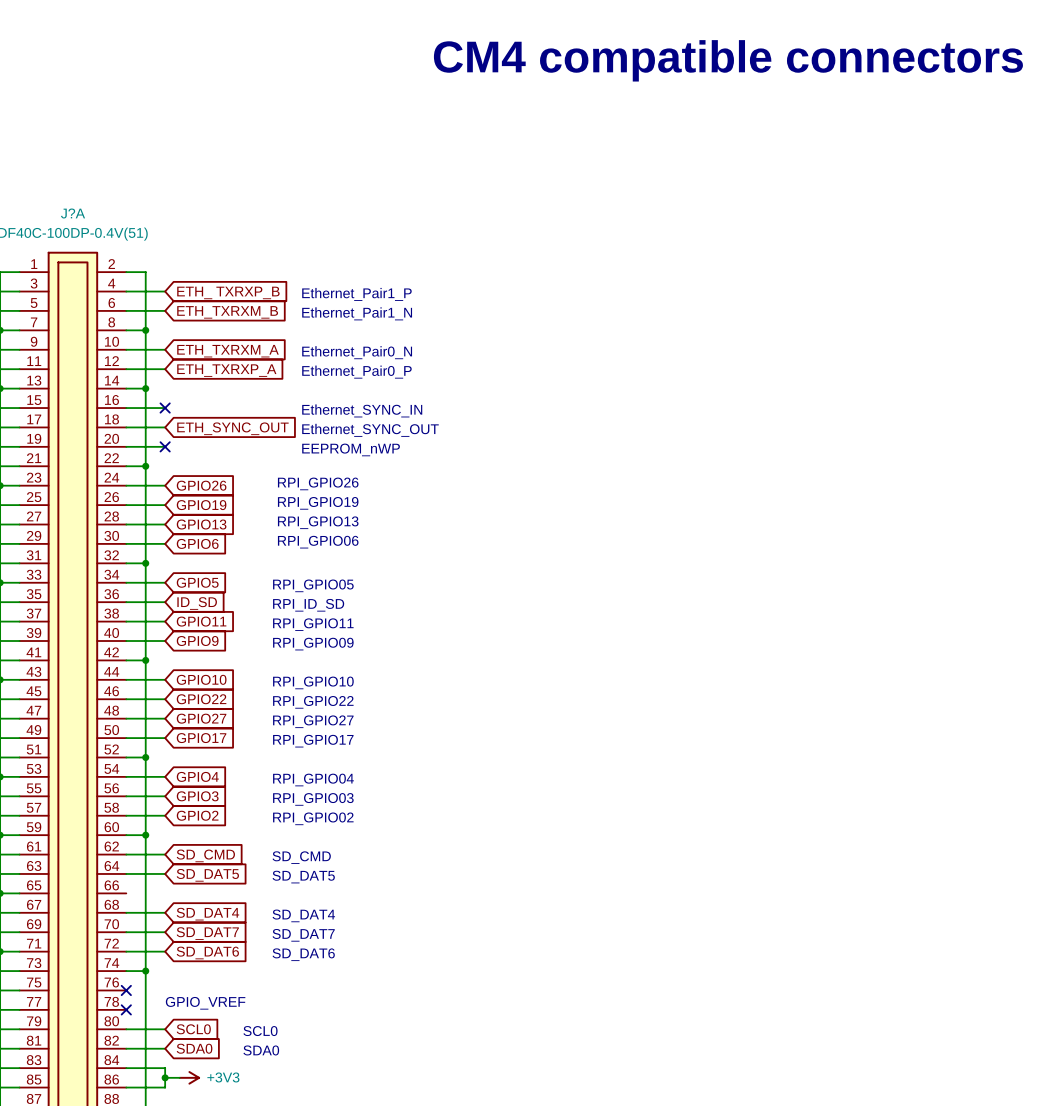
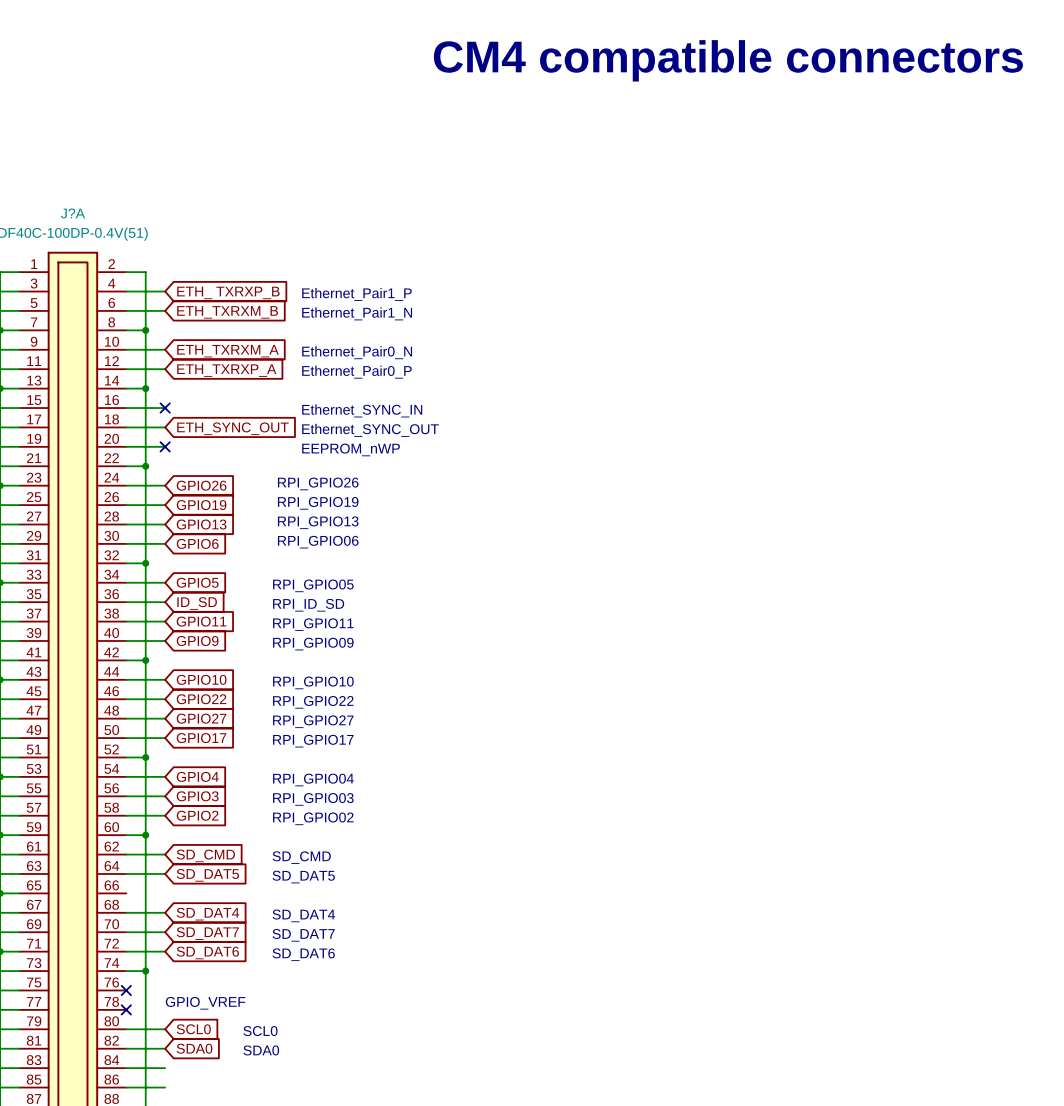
wire: (165, 1068) (165, 1087) -> none
wire: (165, 1077) (179, 1077) -> none
junction: (165, 1077) -> none
power symbol: +3V3 (189, 1077) -> none

